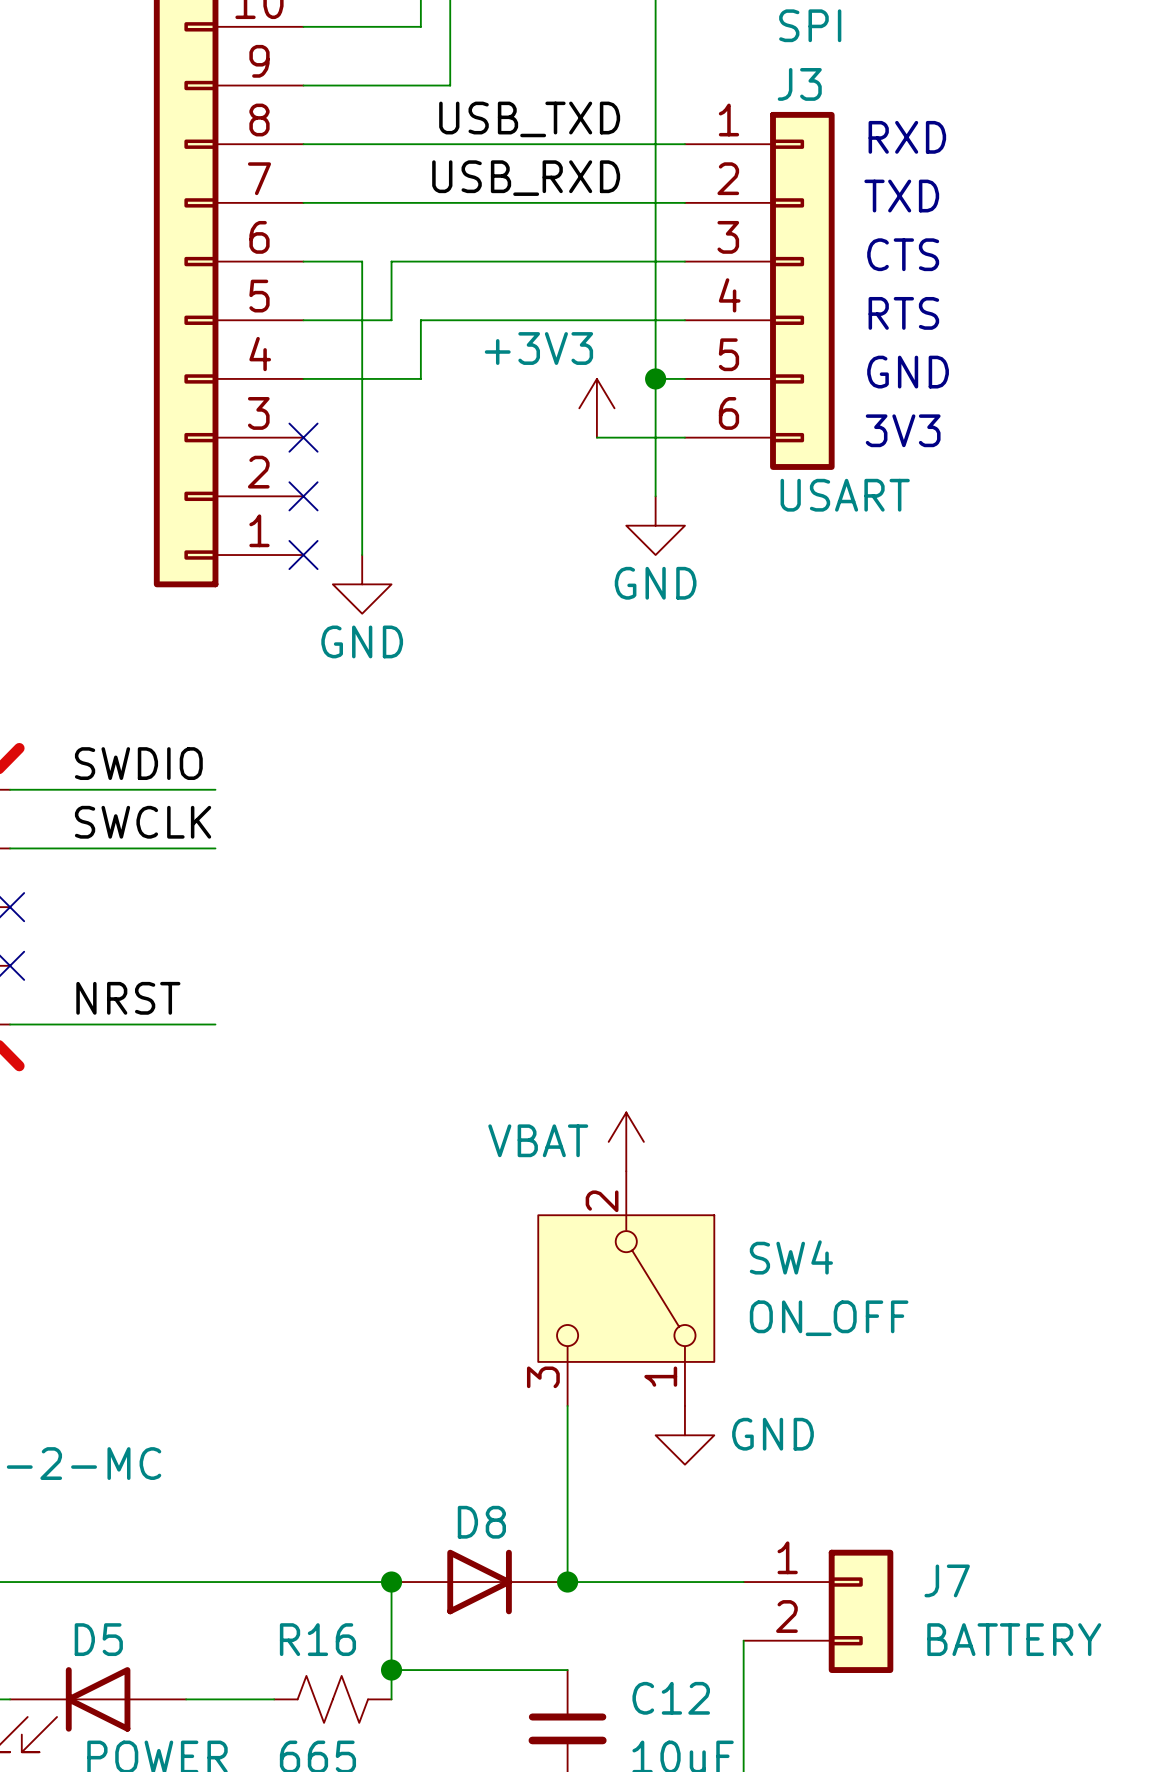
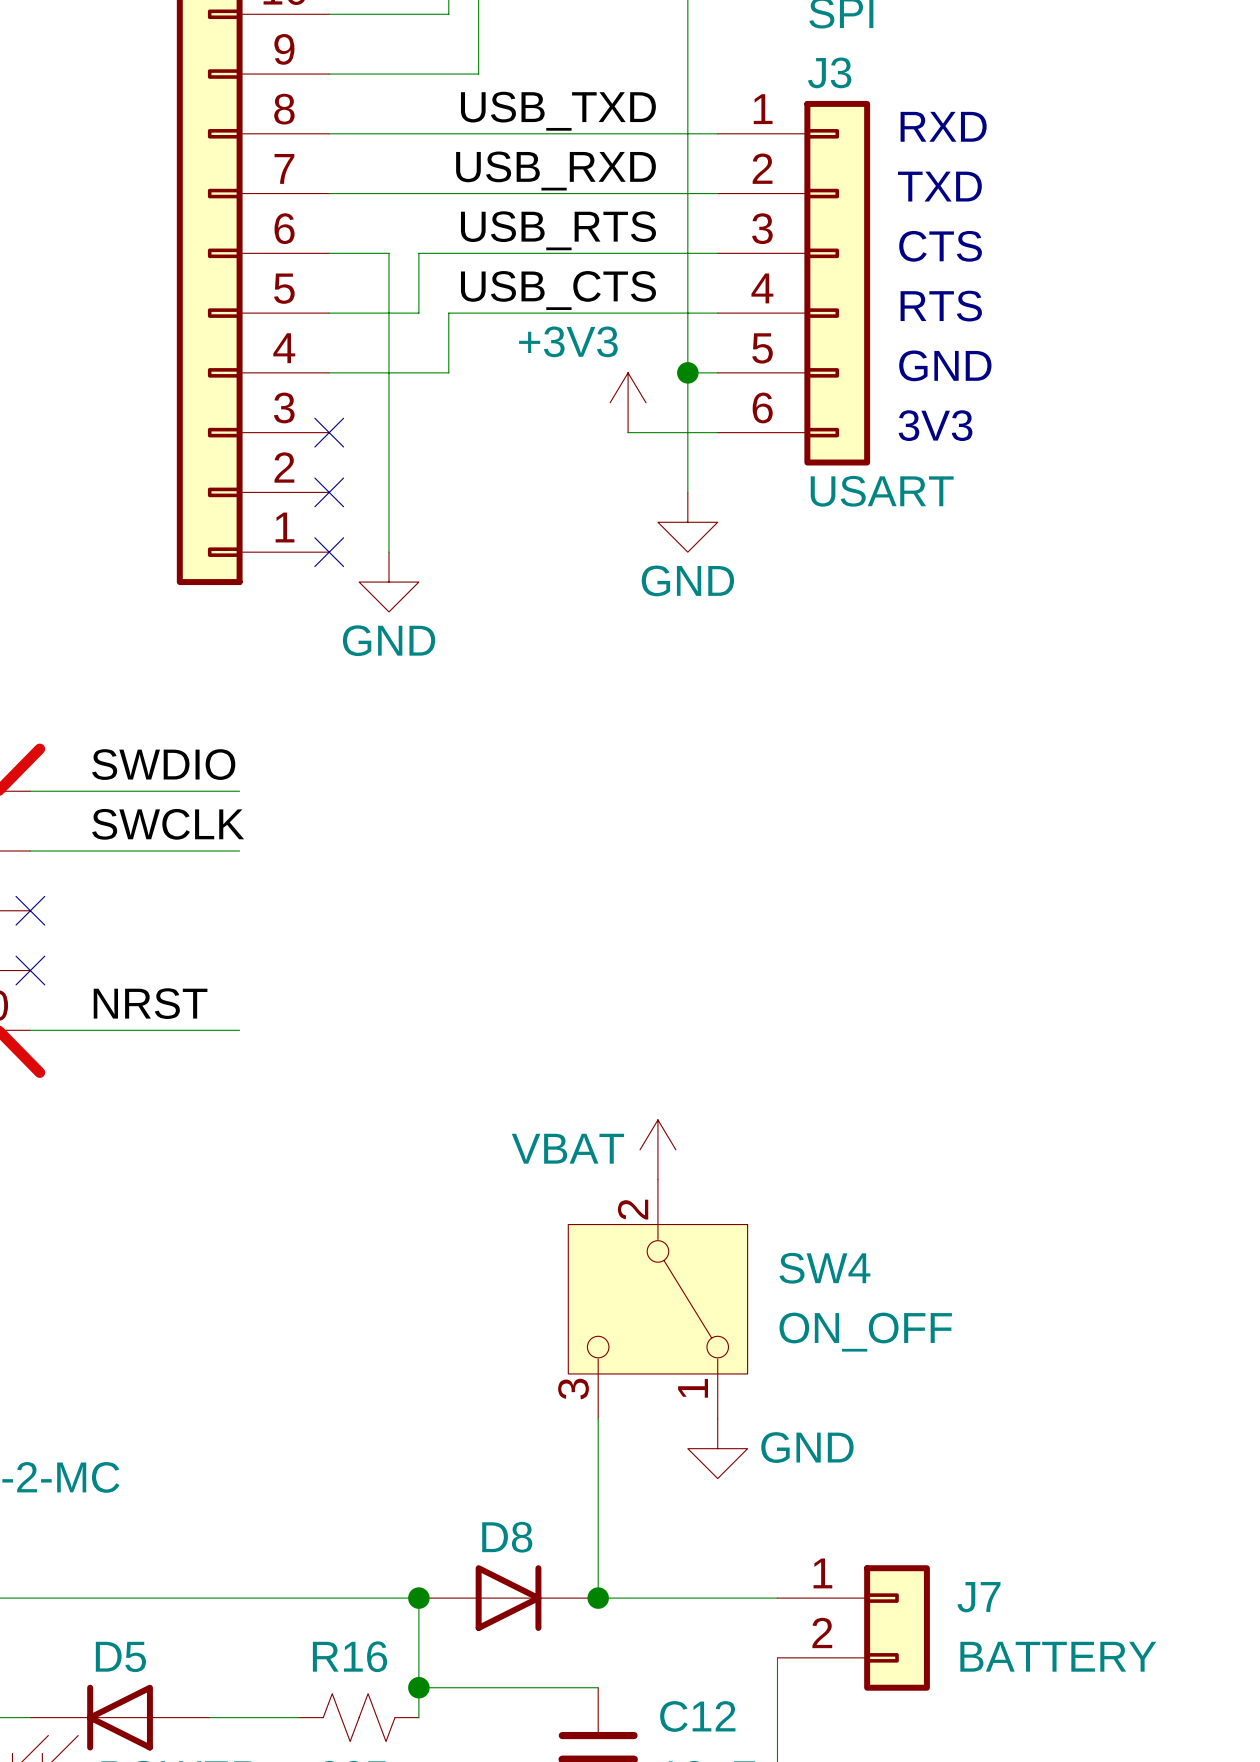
label: none -> USB_RTS (558, 230)
label: none -> USB_CTS (558, 290)

